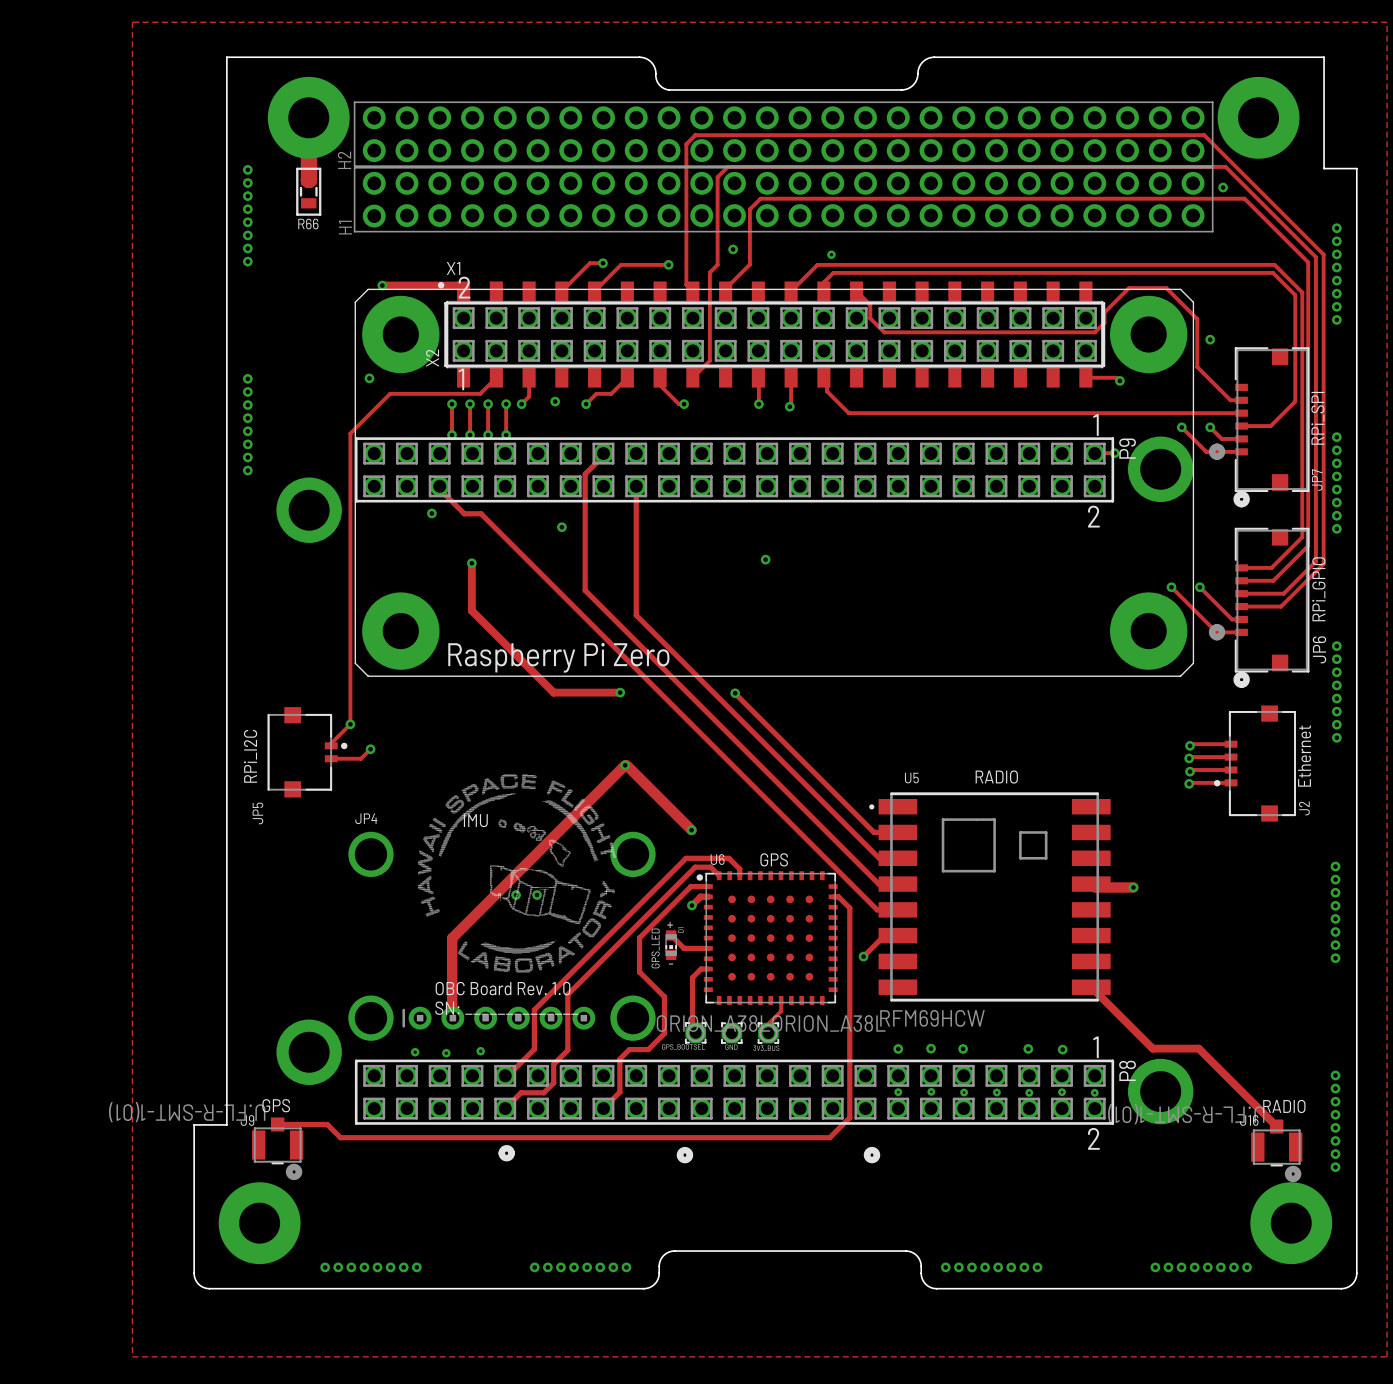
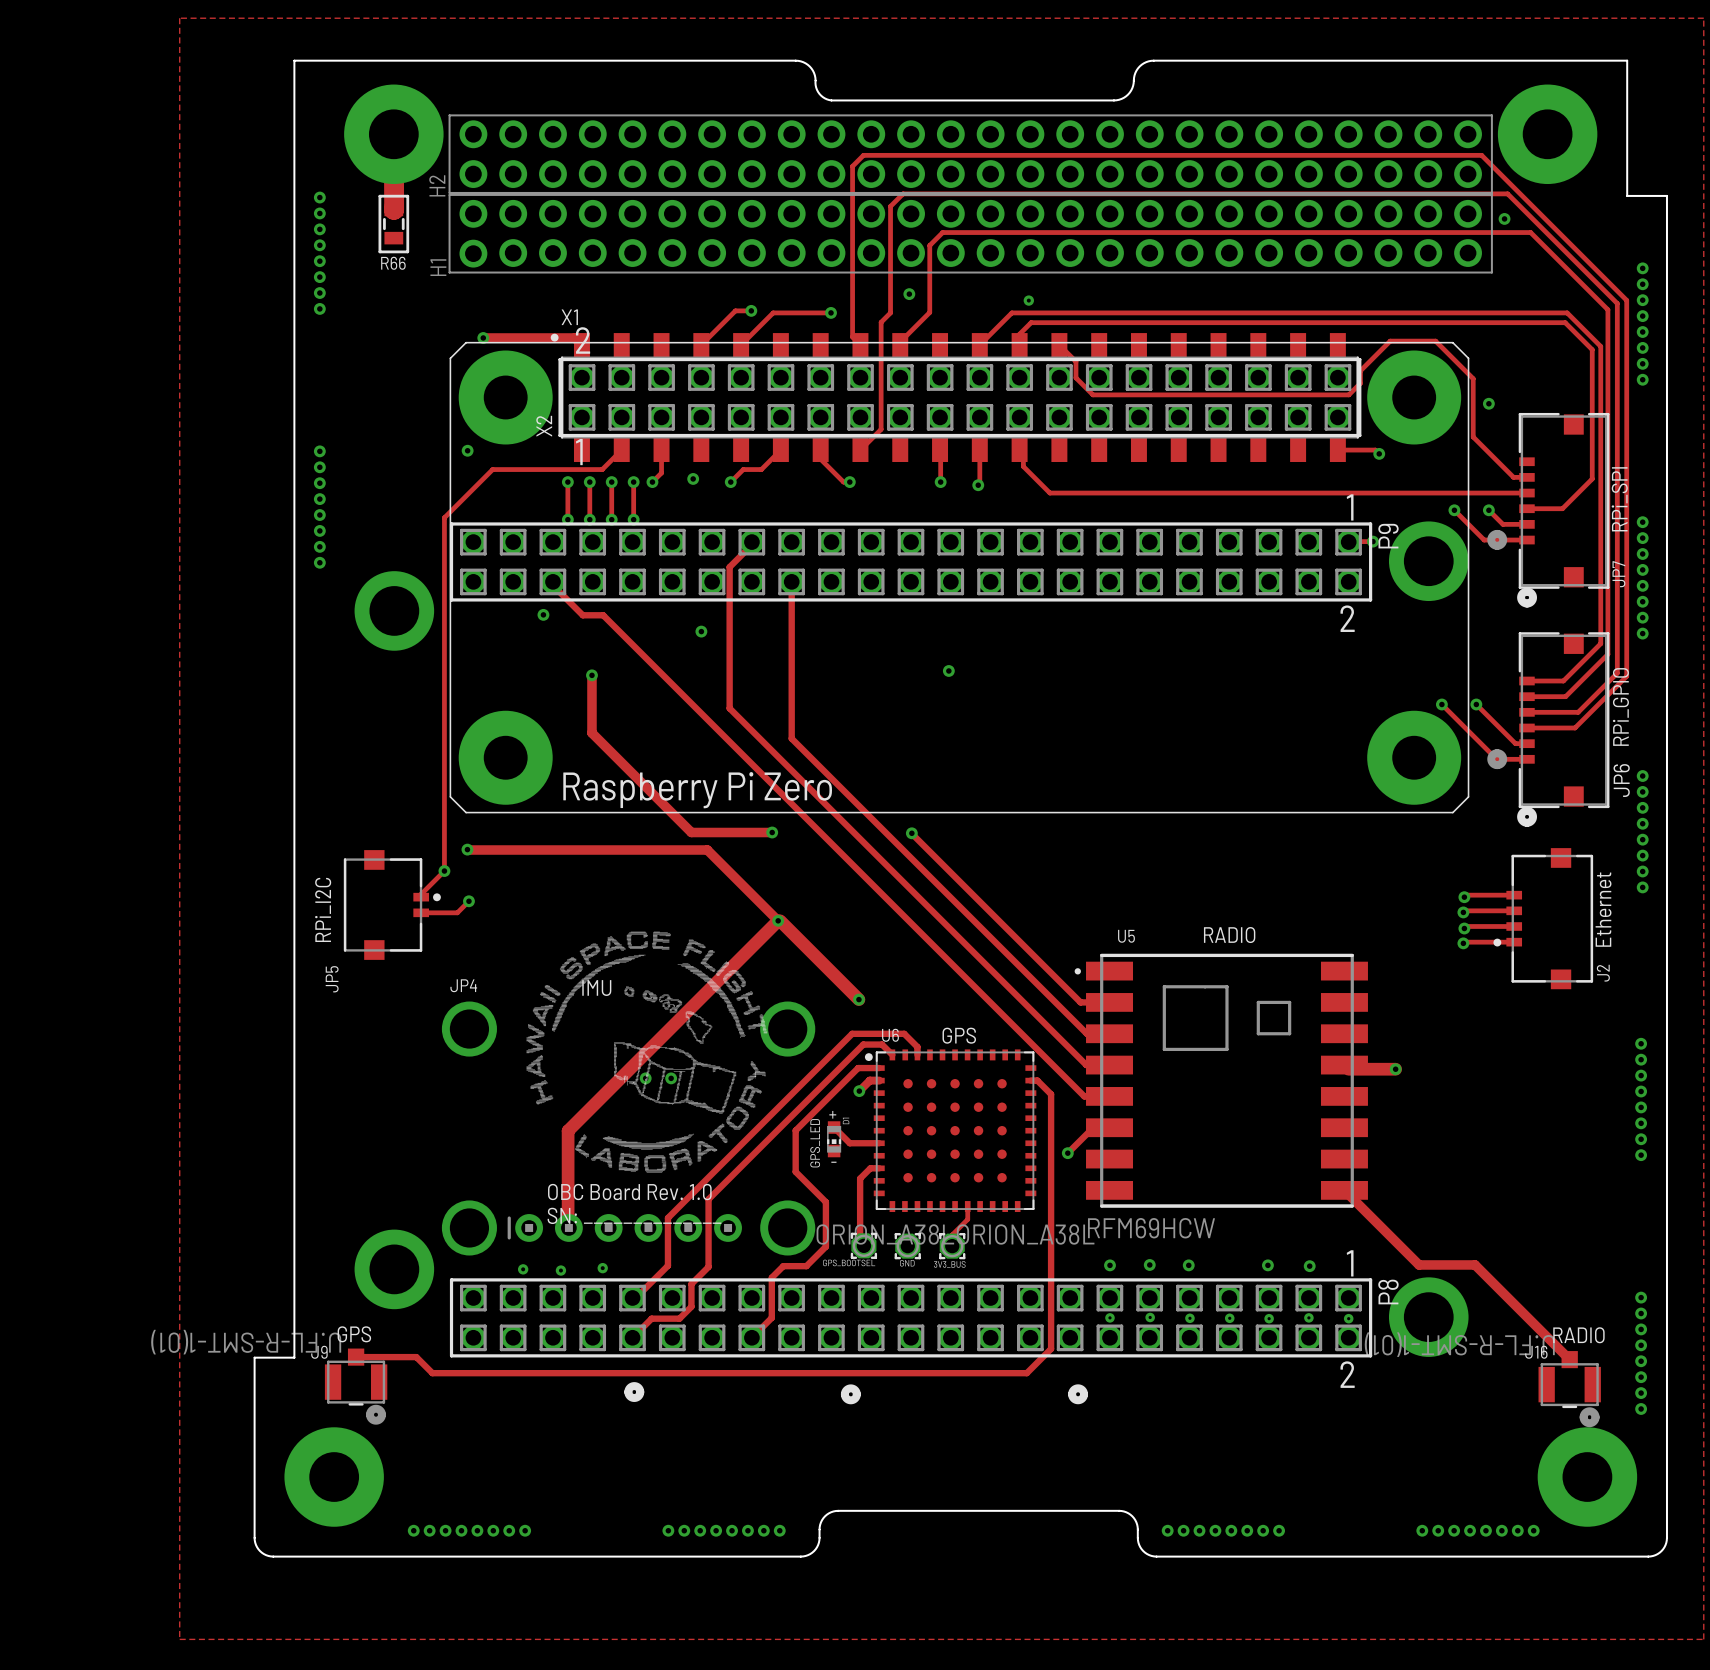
track: none -> (467, 849) (707, 850) (778, 920)
via: none -> (467, 849)

